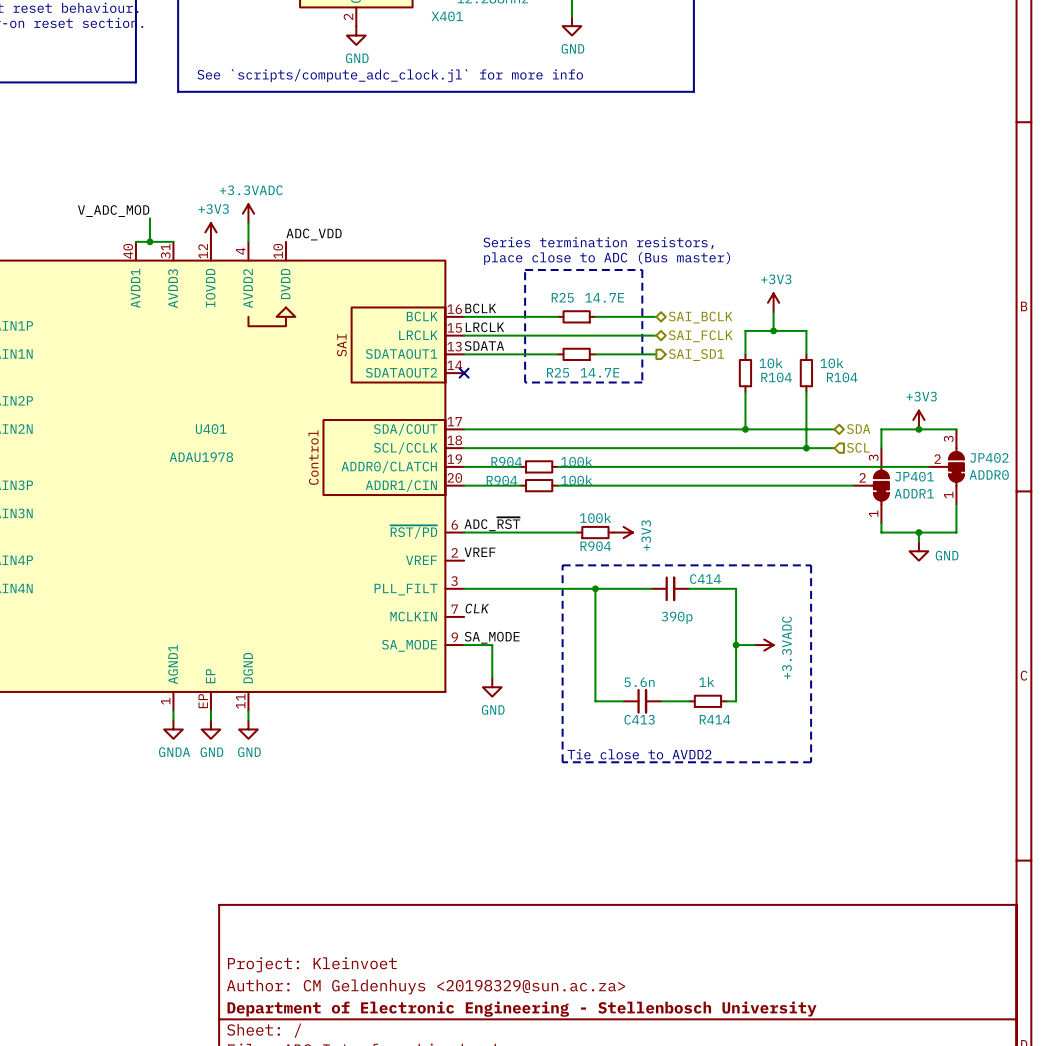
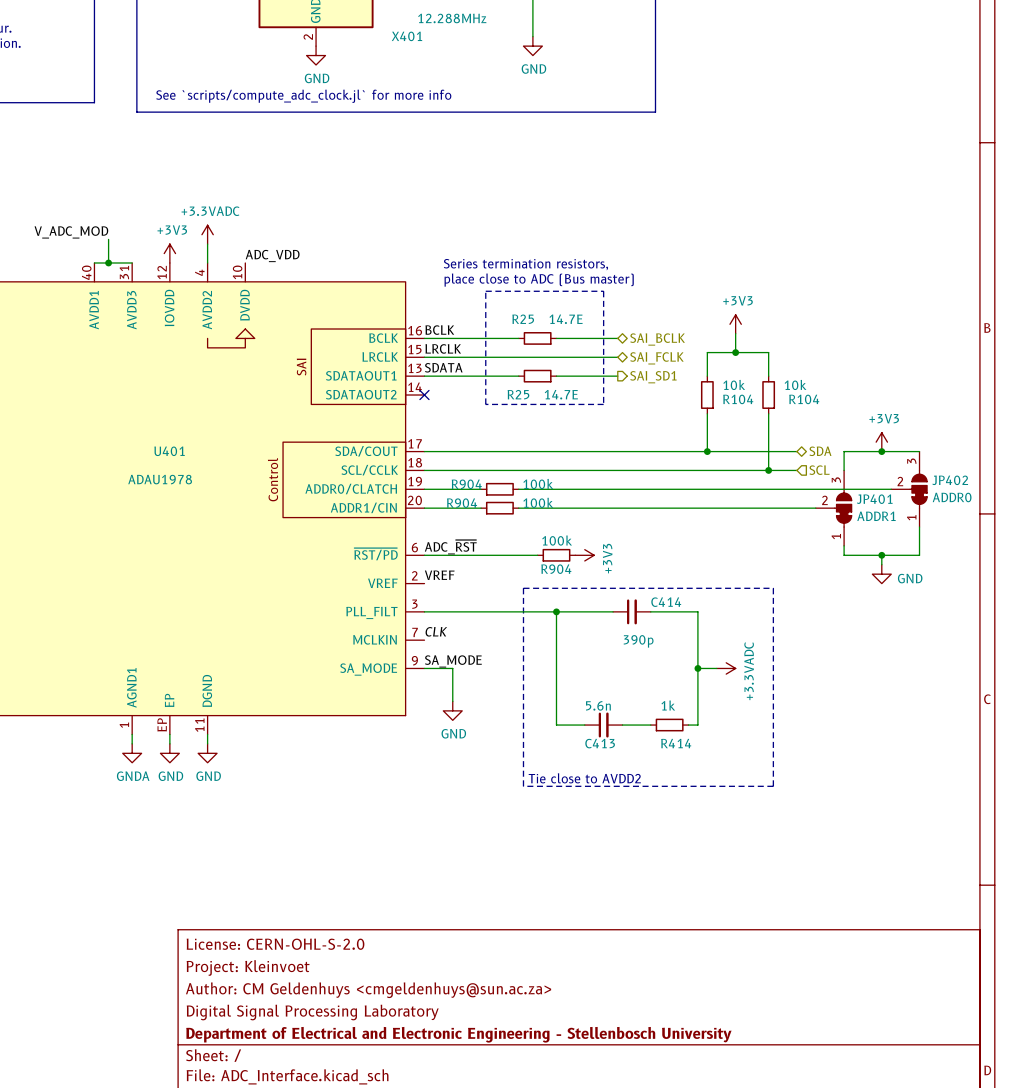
title block: none -> License: CERN-OHL-S-2.0 (275, 944)
title block: none -> Project: Kleinvoet (248, 967)
title block: Project: Kleinvoet (312, 964) -> Author: CM Geldenhuys <cmgeldenhuys@sun.ac.za> (368, 990)
title block: Author: CM Geldenhuys <20198329@sun.ac.za> (426, 986) -> Digital Signal Processing Laboratory (312, 1012)
title block: Department of Electronic Engineering - Stellenbosch University (522, 1009) -> Department of Electrical and Electronic Engineering - Stellenbosch University (458, 1034)

